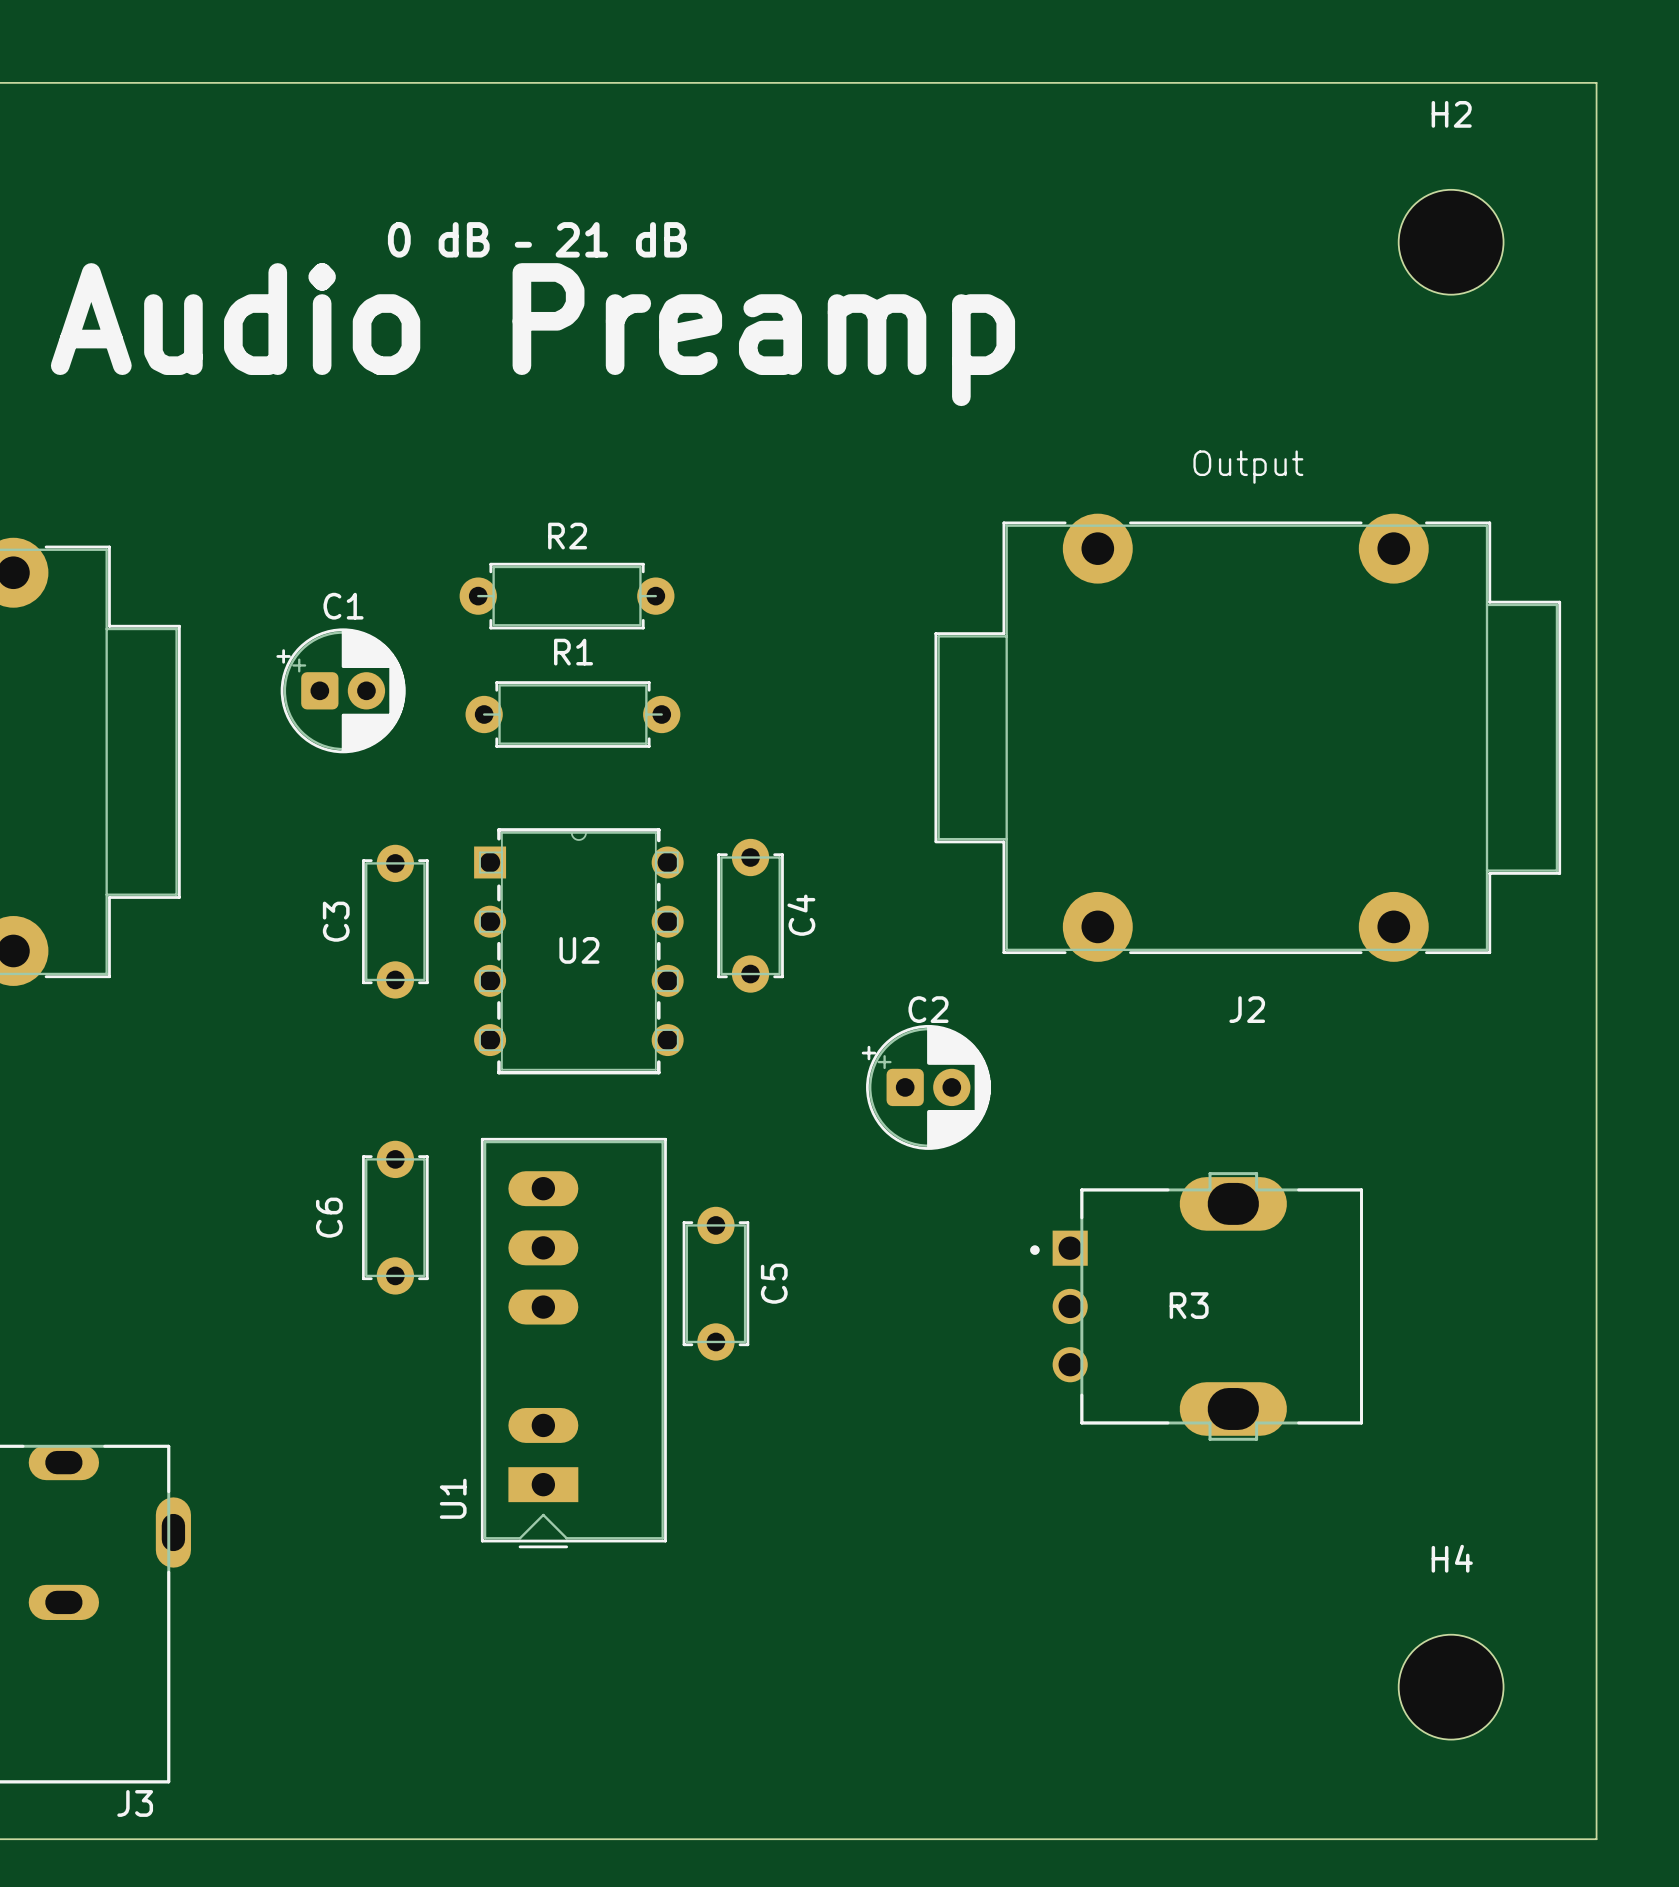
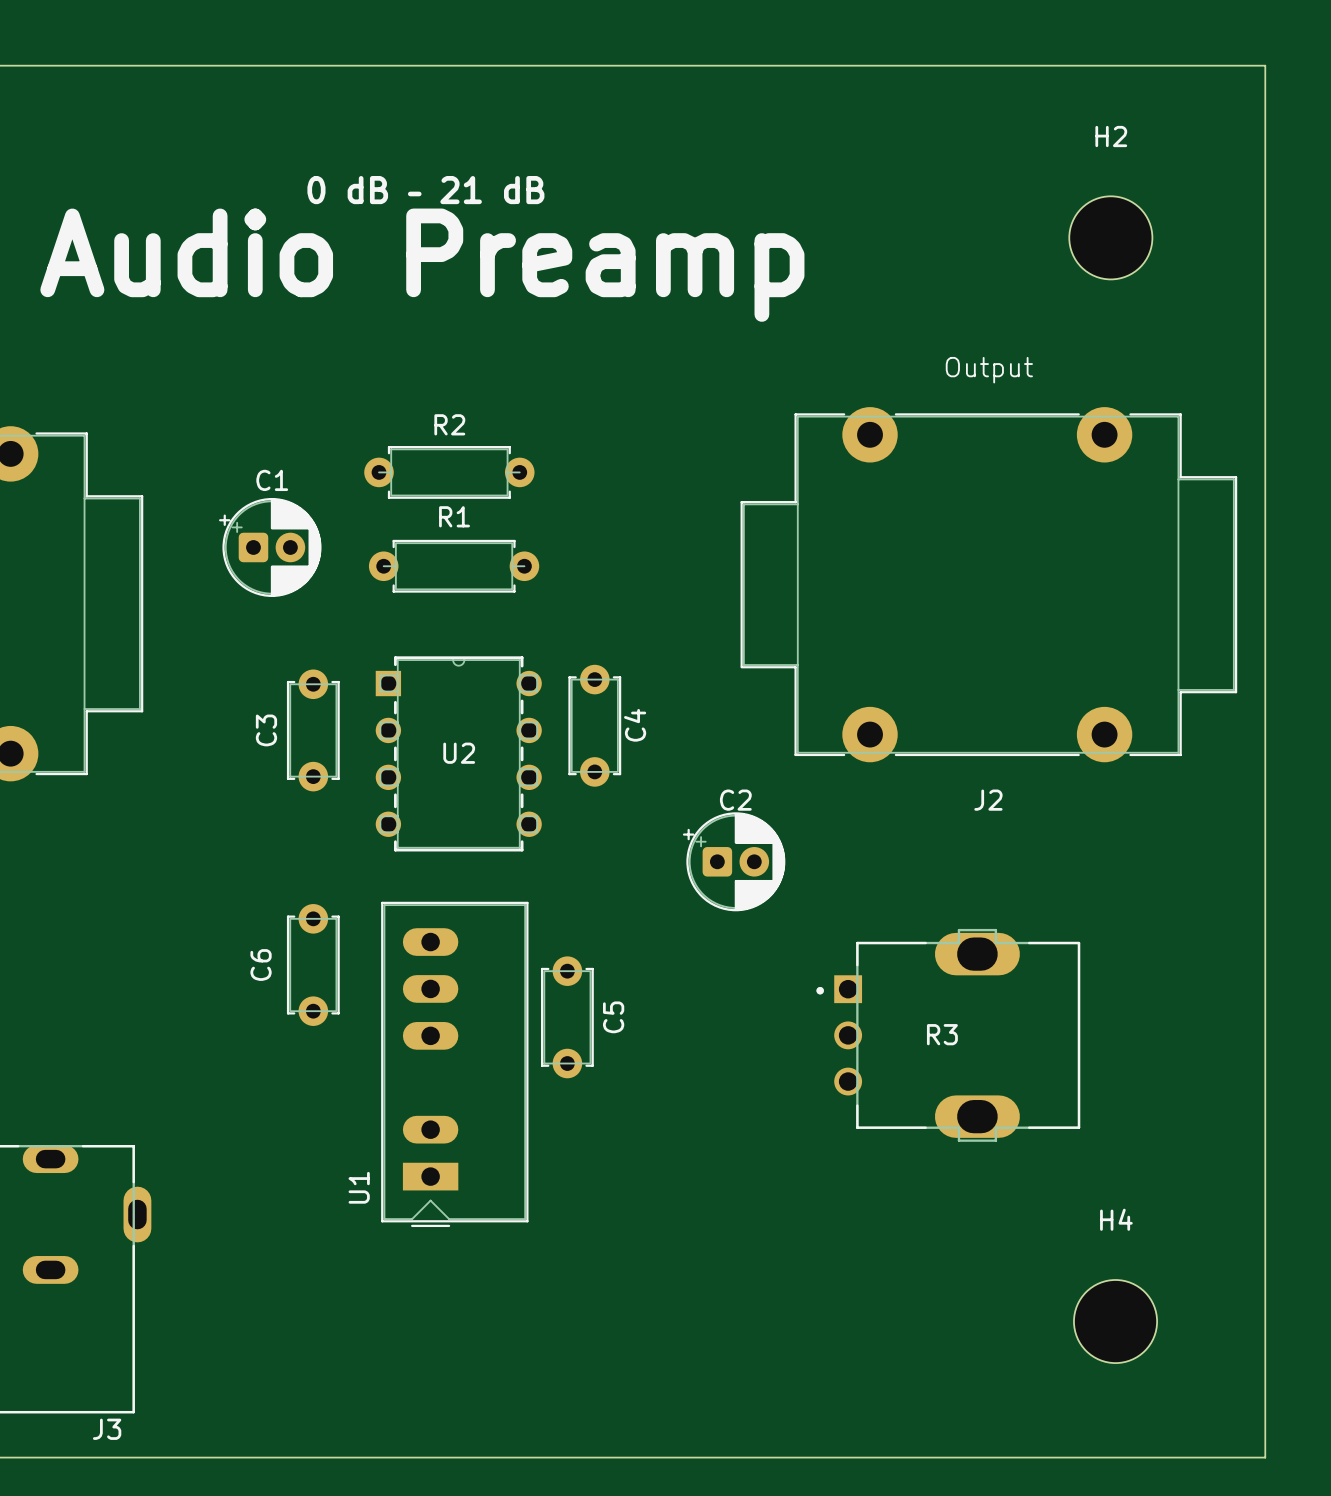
H2 position: (1451, 242) -> (1110, 237)
H4 position: (1451, 1687) -> (1115, 1321)

